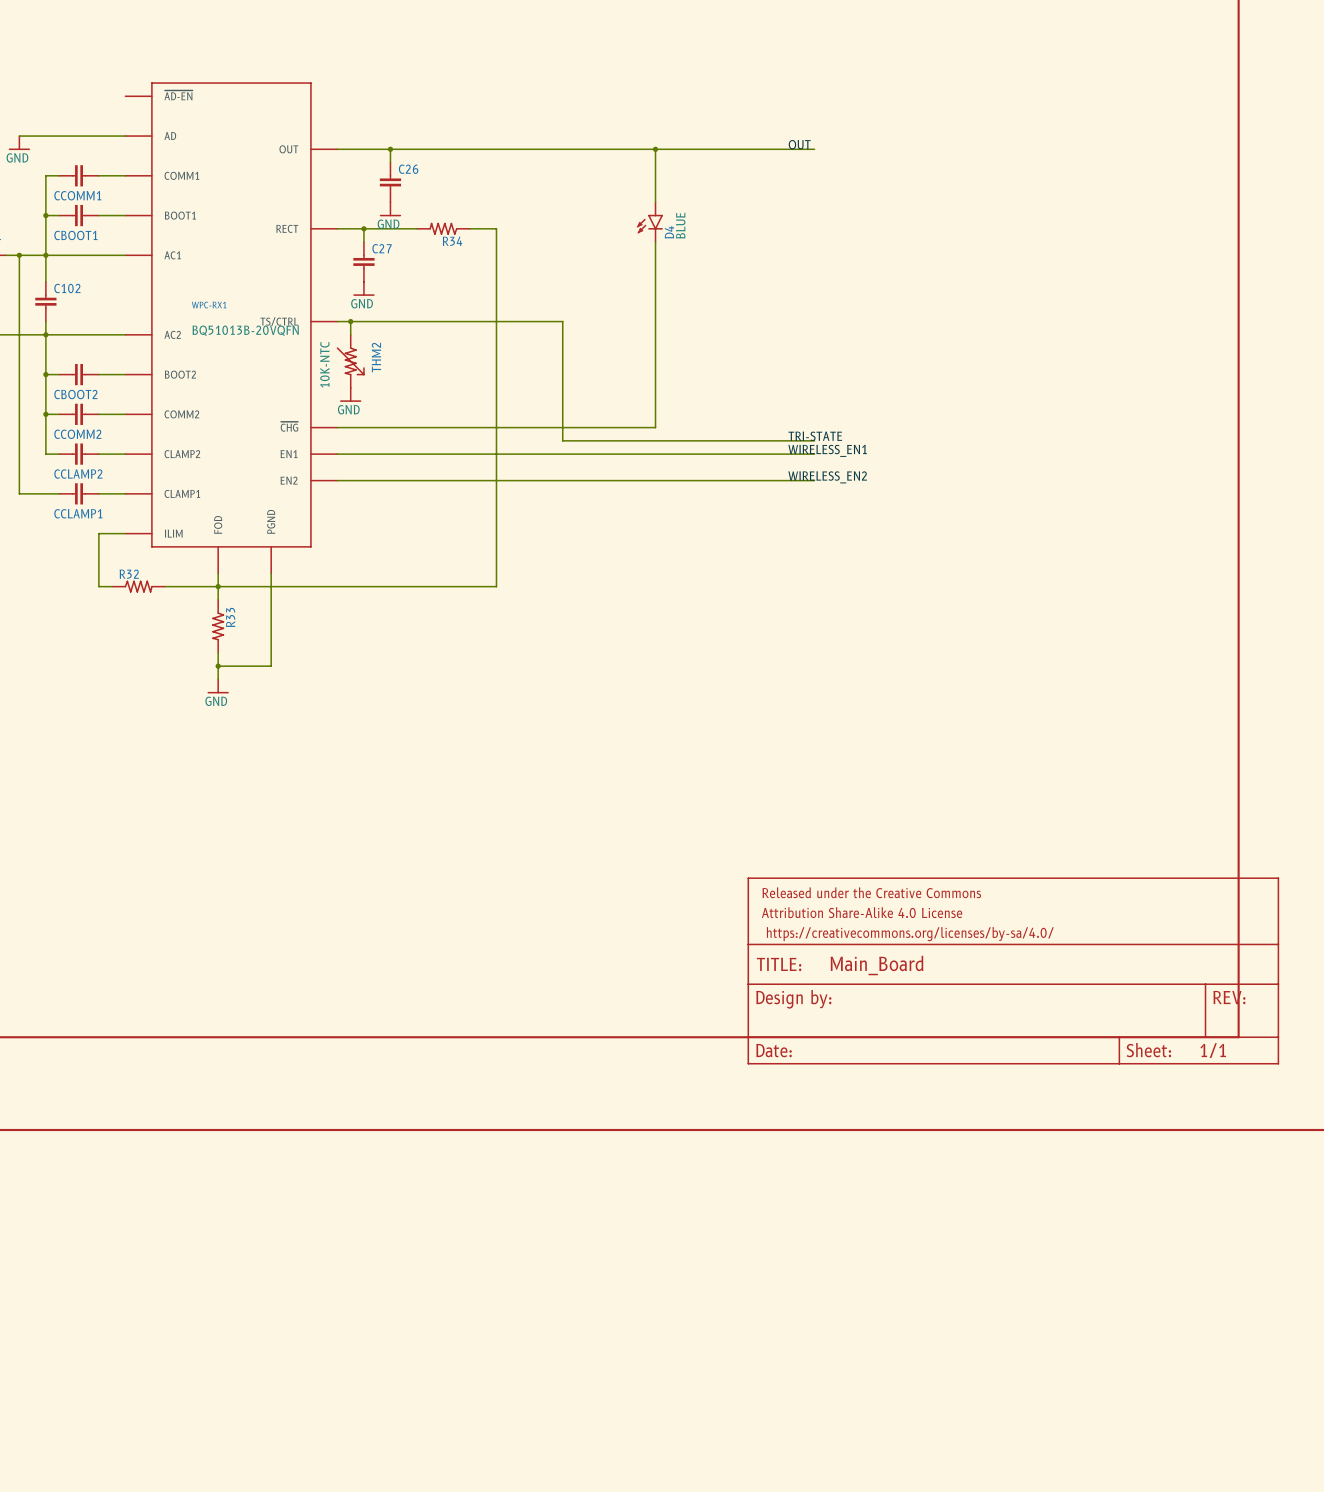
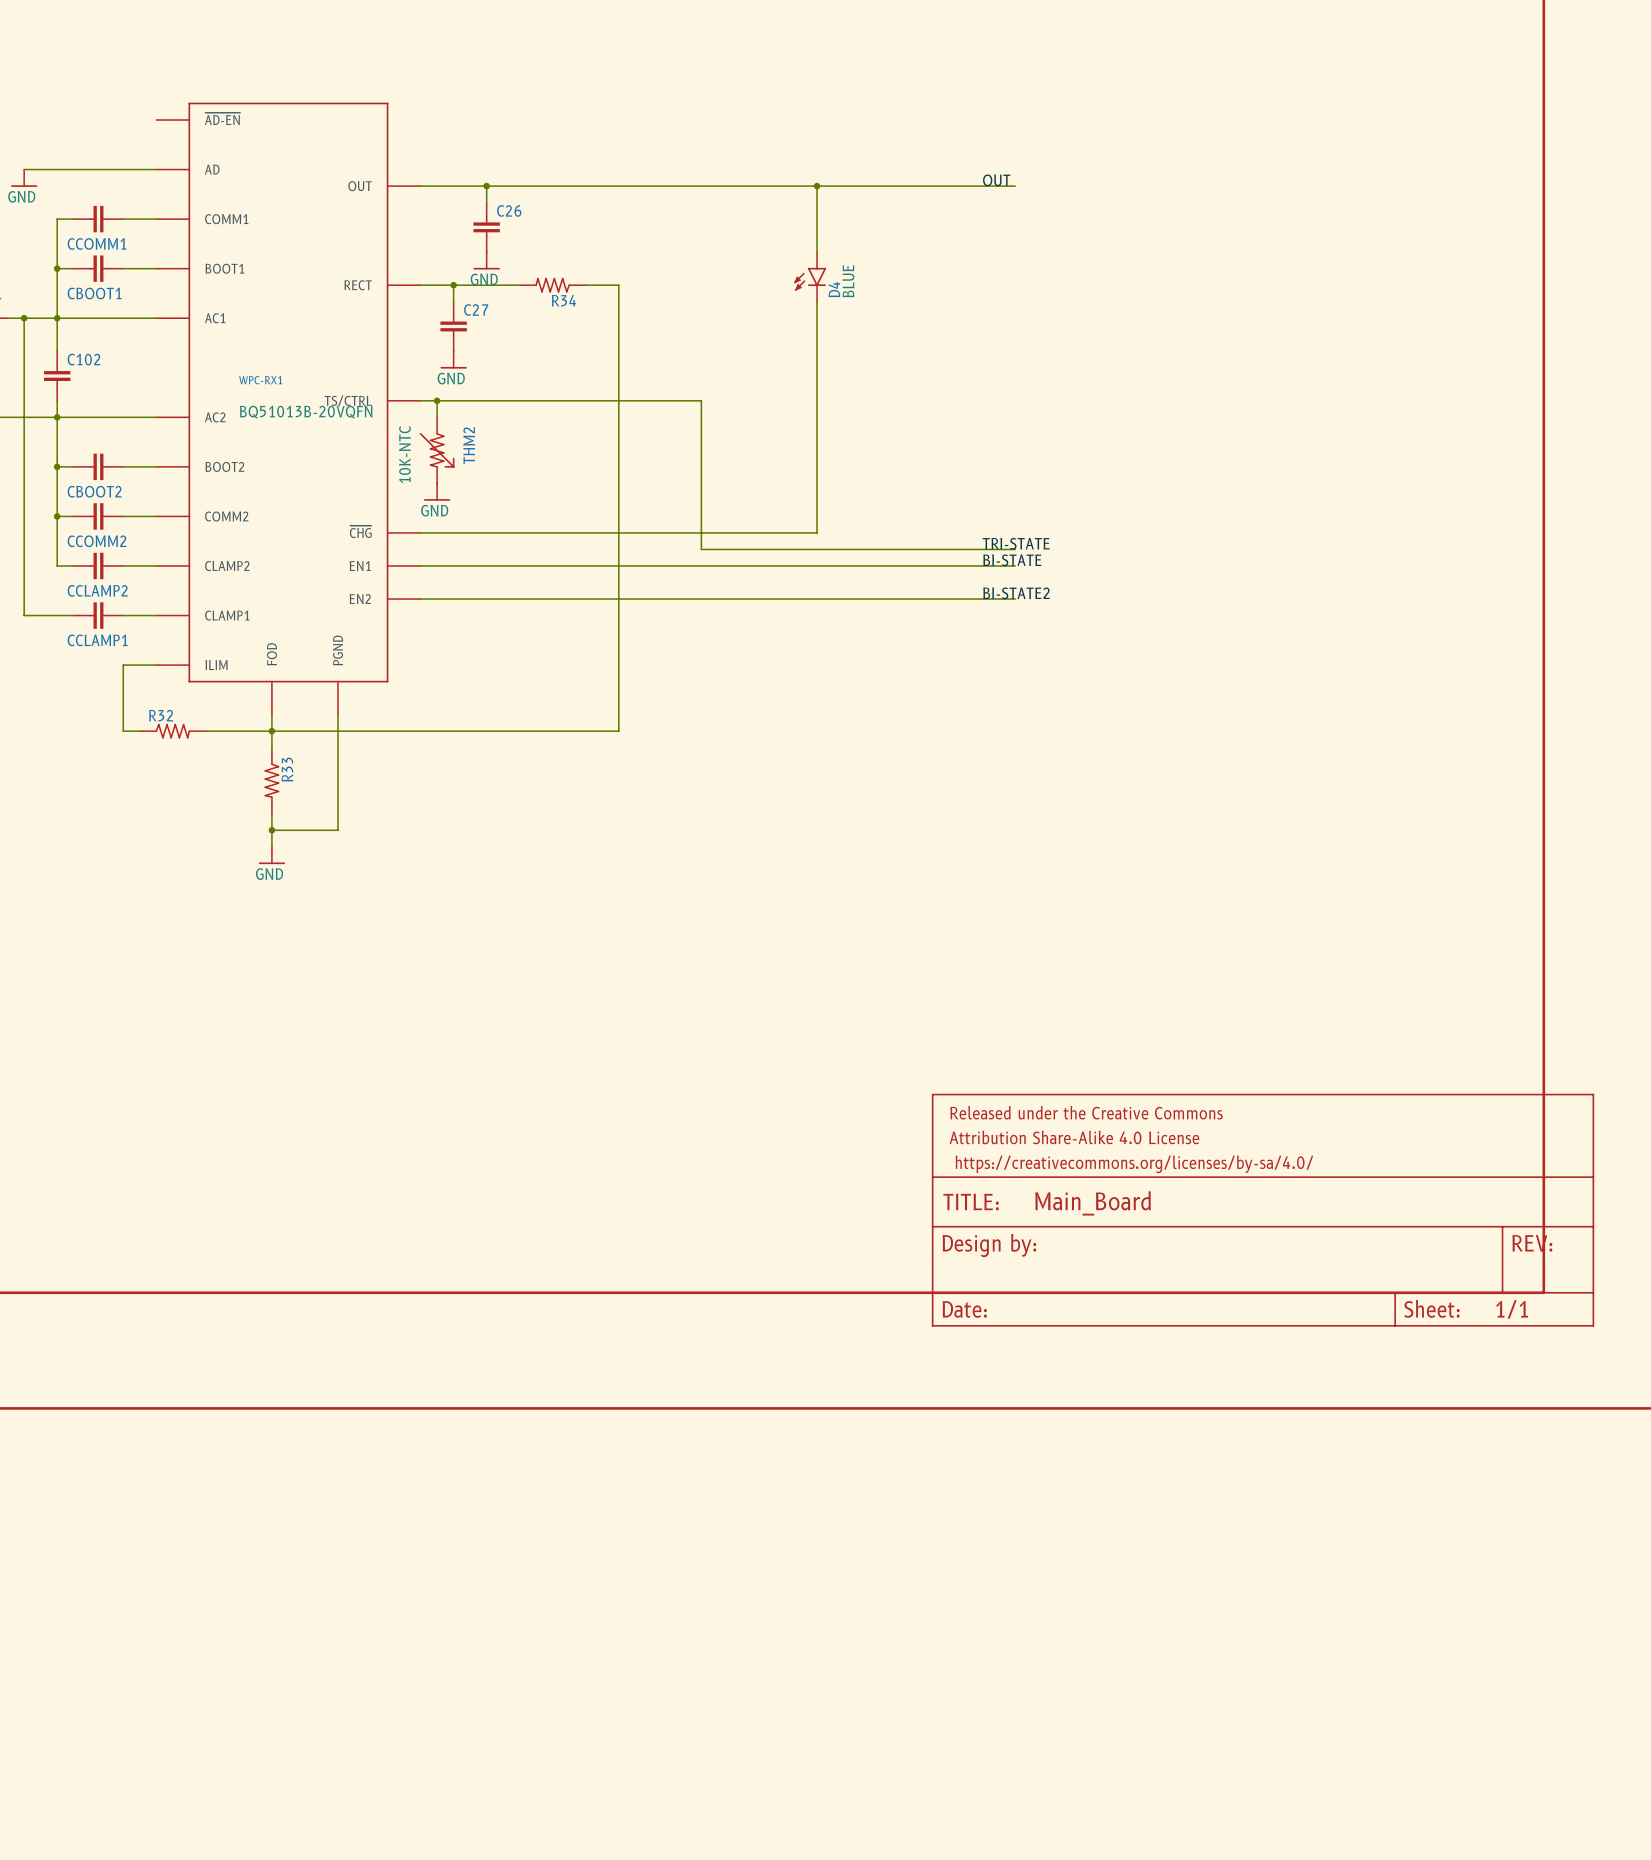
label: WIRELESS_EN1 (827, 450) -> BI-STATE (1012, 560)
label: WIRELESS_EN2 (827, 477) -> BI-STATE2 (1016, 593)

